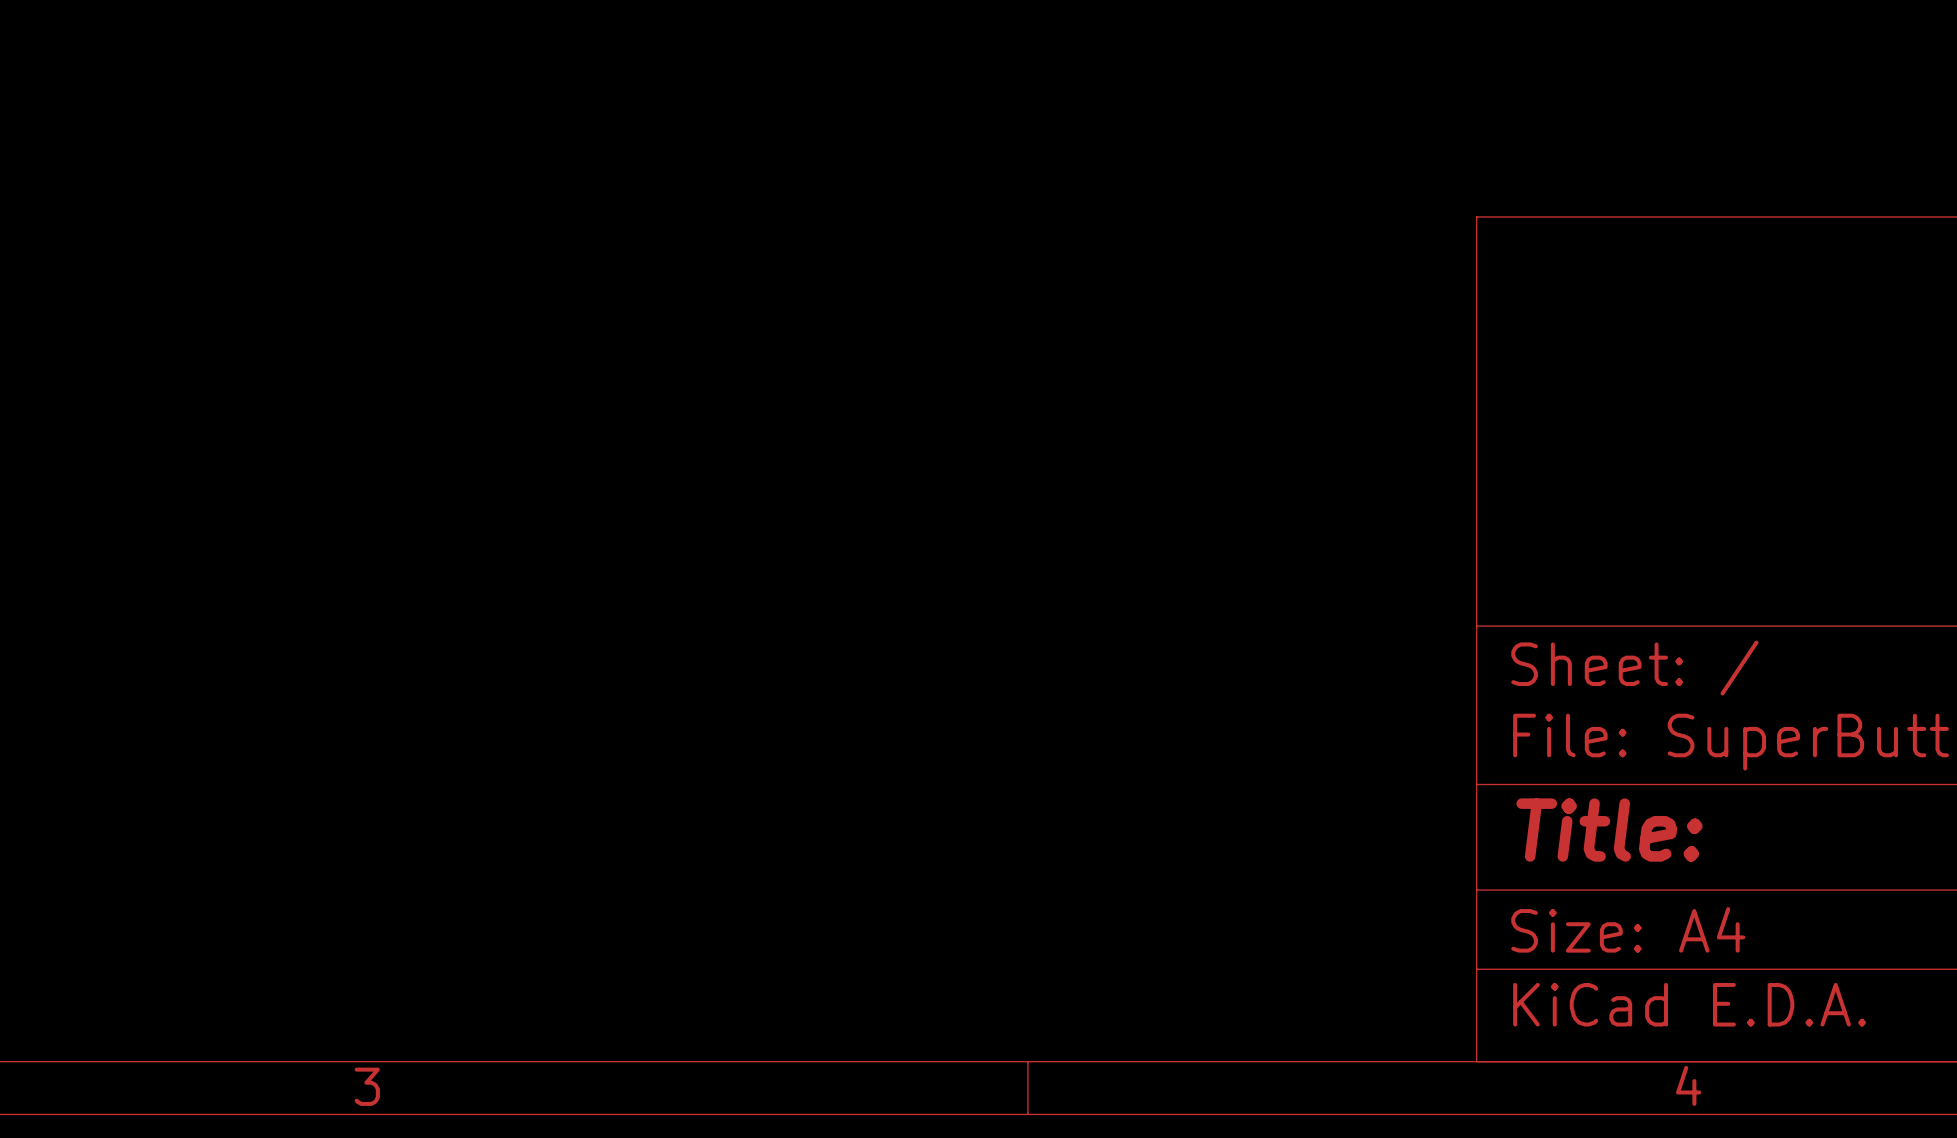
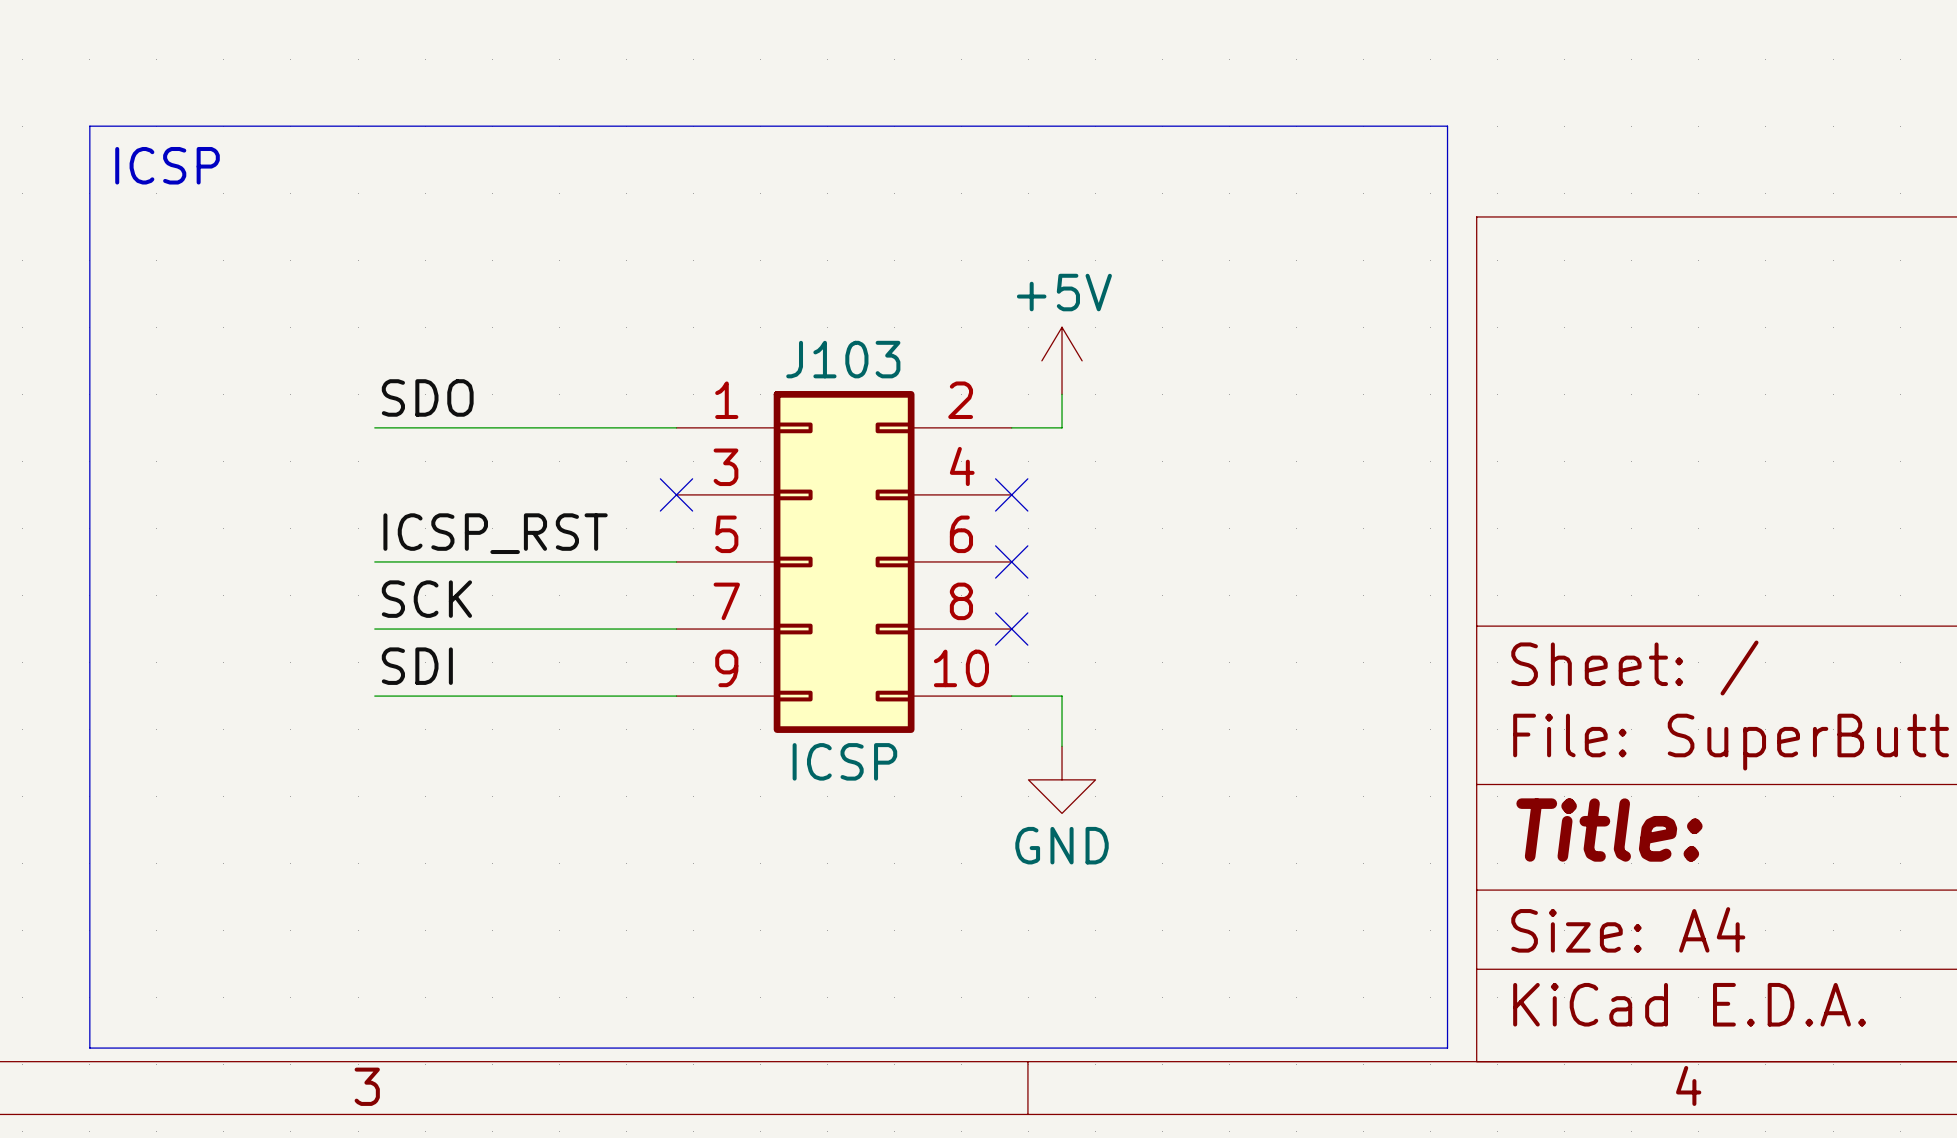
line: none -> (89, 126) (1447, 126) (1447, 1048) (89, 1048) (89, 126)
text: none -> ICSP (167, 165)
power symbol: none -> +5V (1062, 360)
wire: none -> (1062, 394) (1062, 427) (1011, 427)
label: none -> SDO (427, 397)
wire: none -> (374, 427) (676, 427)
no-connect mark: none -> (676, 494)
no-connect mark: none -> (1011, 494)
label: none -> ICSP_RST (495, 533)
wire: none -> (374, 561) (676, 561)
J103: none -> ICSP (844, 561)
no-connect mark: none -> (1011, 561)
label: none -> SCK (426, 599)
wire: none -> (374, 629) (676, 629)
no-connect mark: none -> (1011, 629)
label: none -> SDI (417, 666)
wire: none -> (374, 696) (676, 696)
wire: none -> (1011, 696) (1062, 696) (1062, 746)
power symbol: none -> GND (1062, 779)

